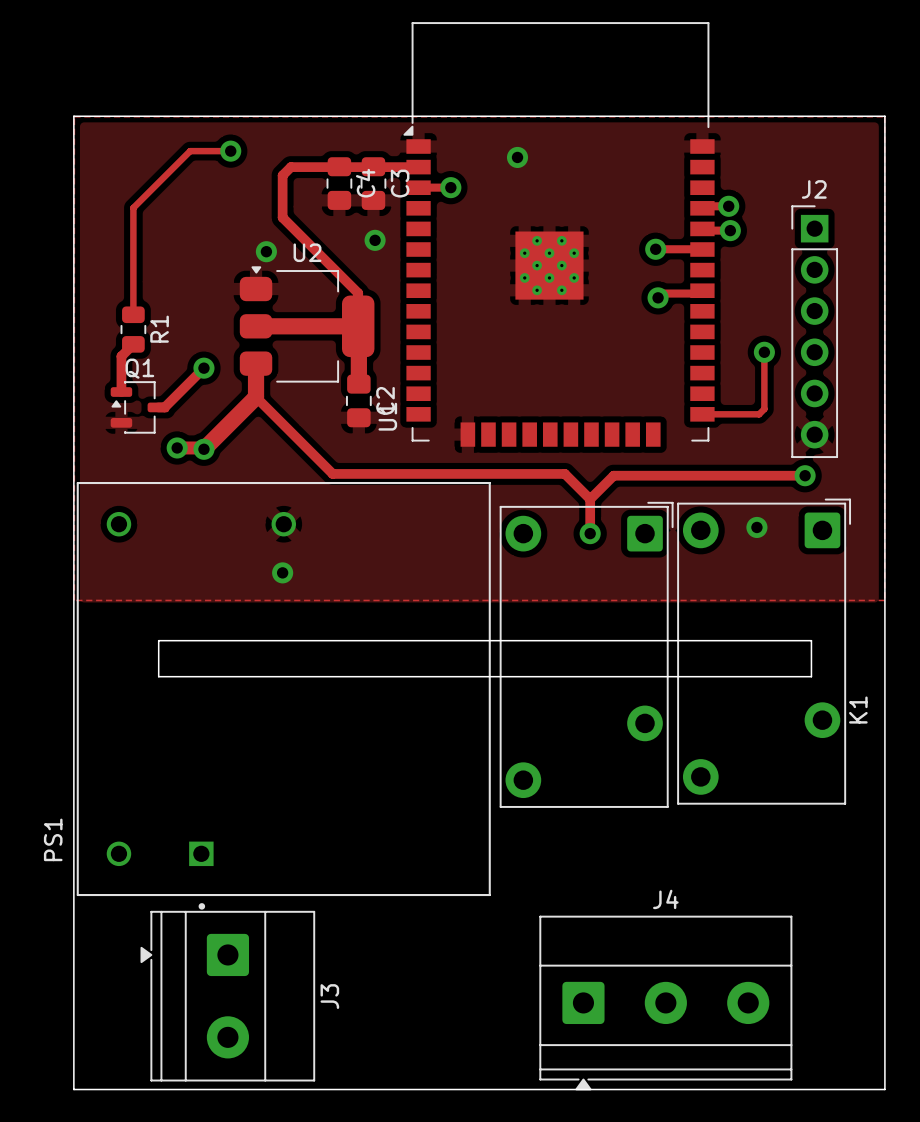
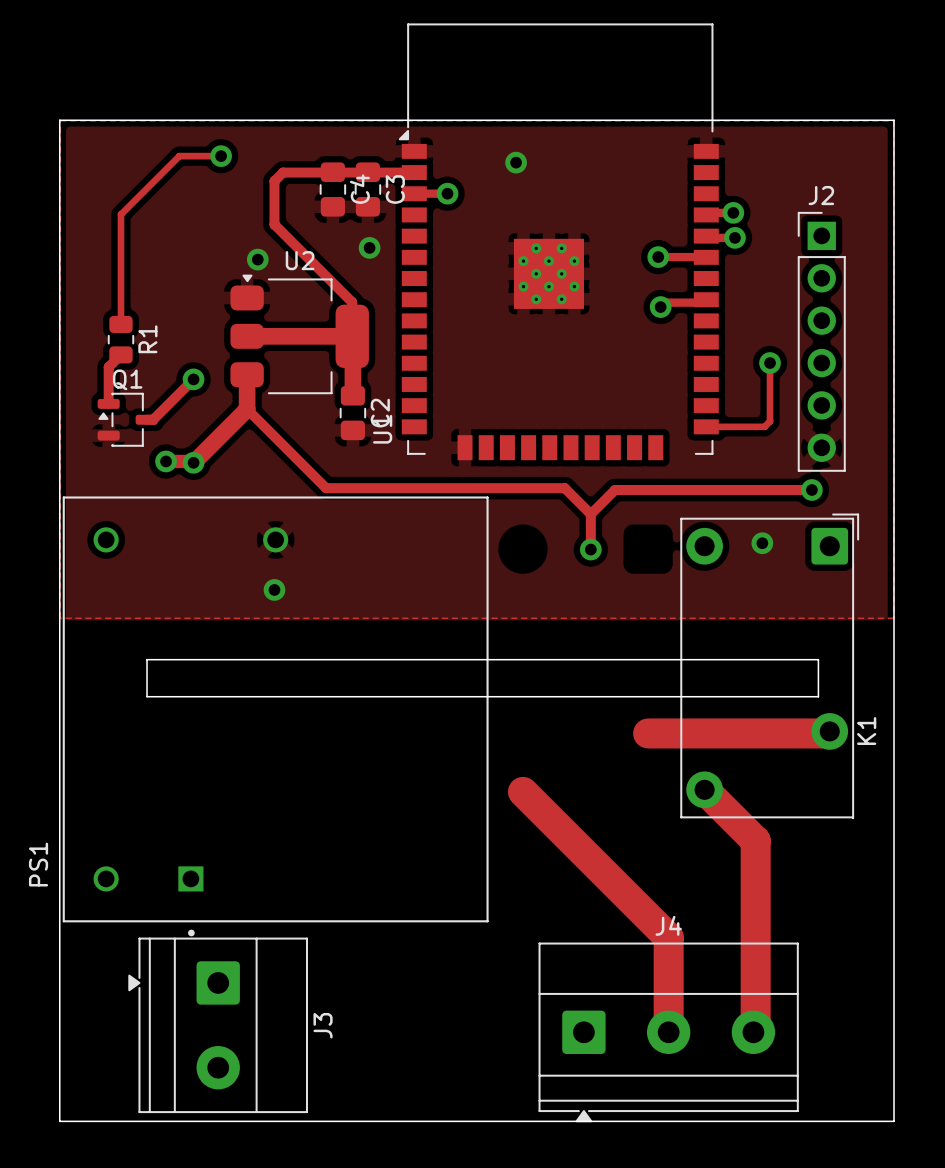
K1 footprint: [677, 498, 852, 805] -> [680, 513, 860, 820]
part: (586, 654) -> none
track: none -> (829, 731) (827, 733) (648, 733)
track: none -> (704, 789) (755, 840) (755, 1030)
track: none -> (522, 791) (668, 937) (668, 1032)

